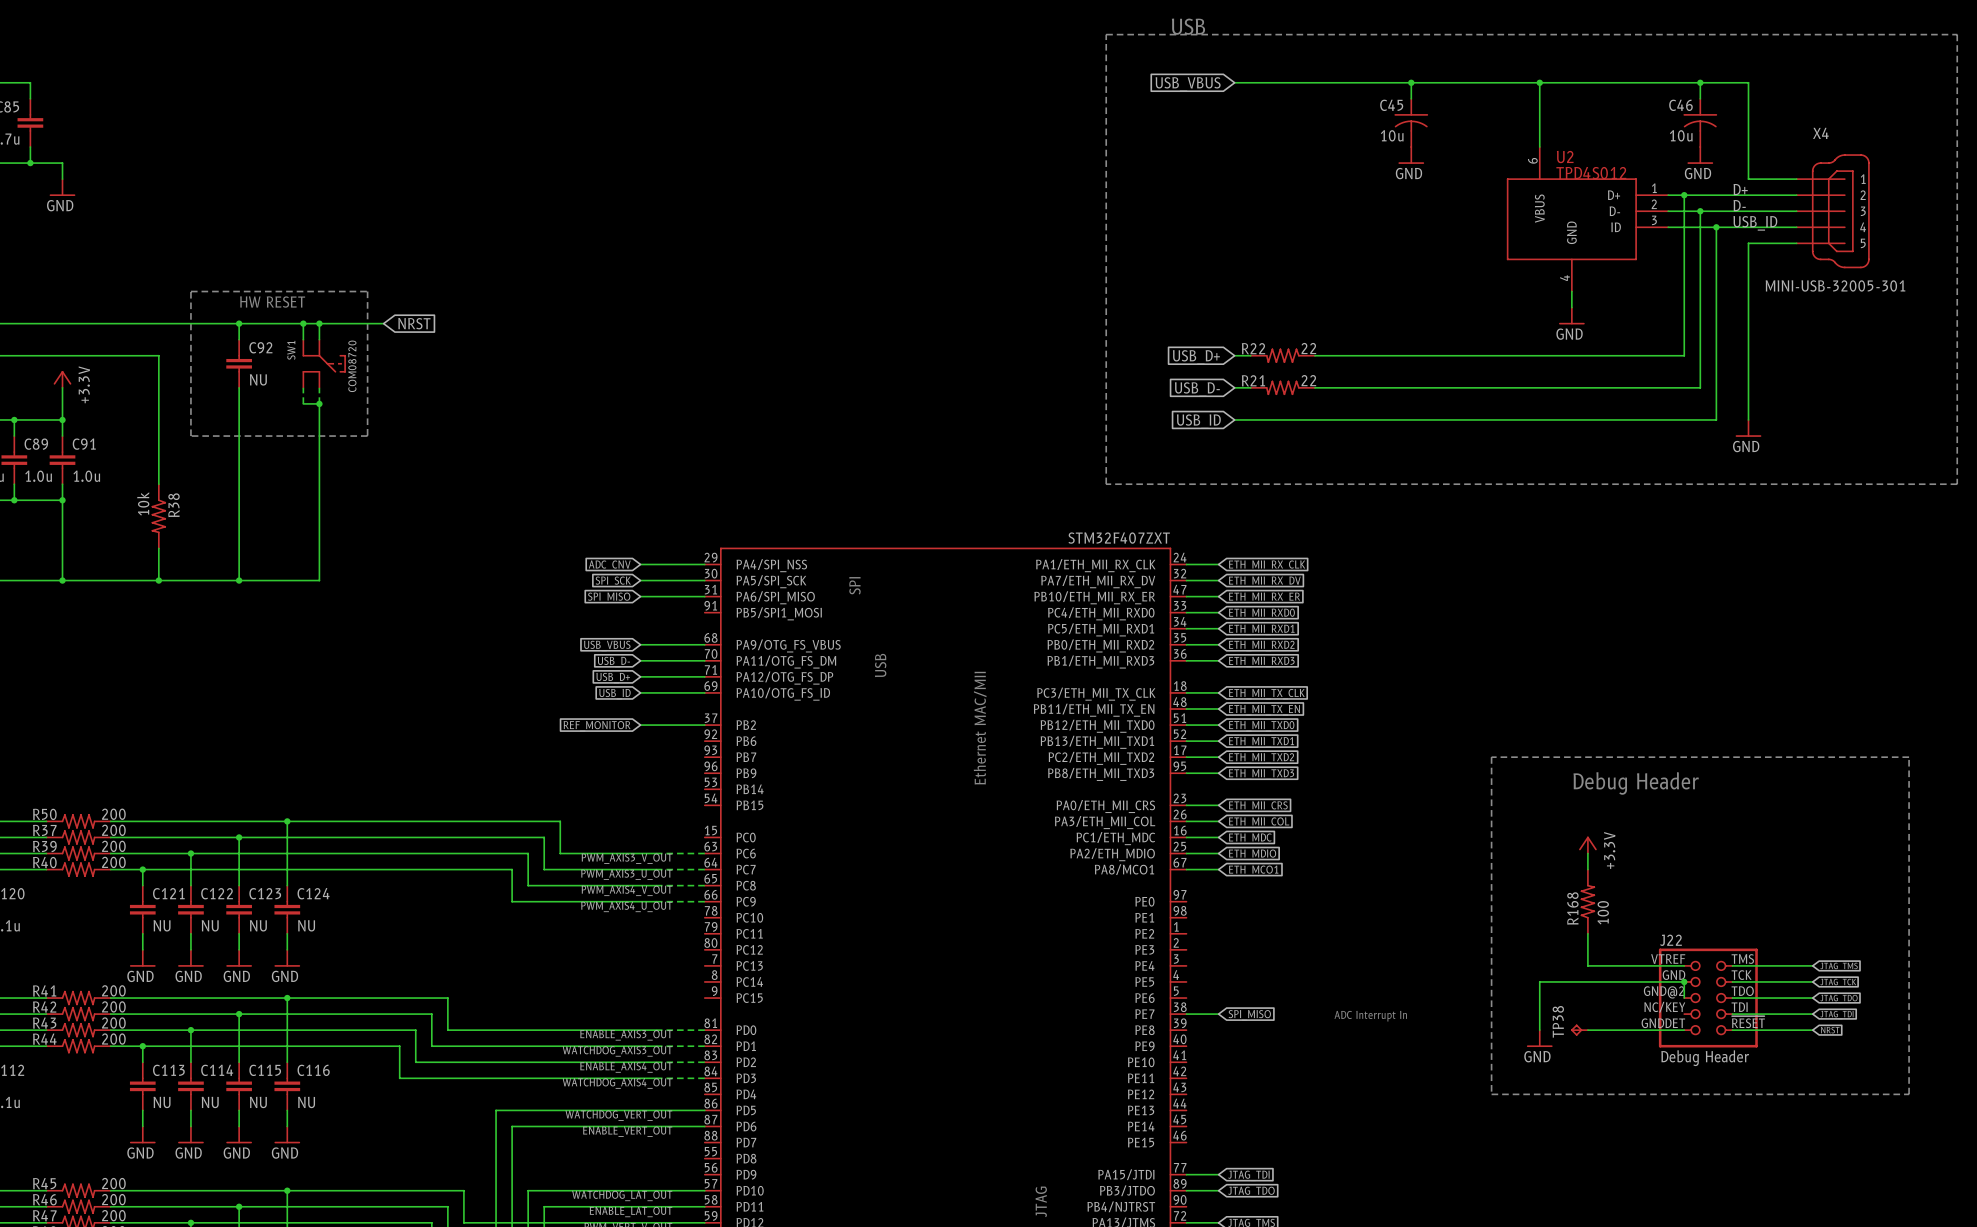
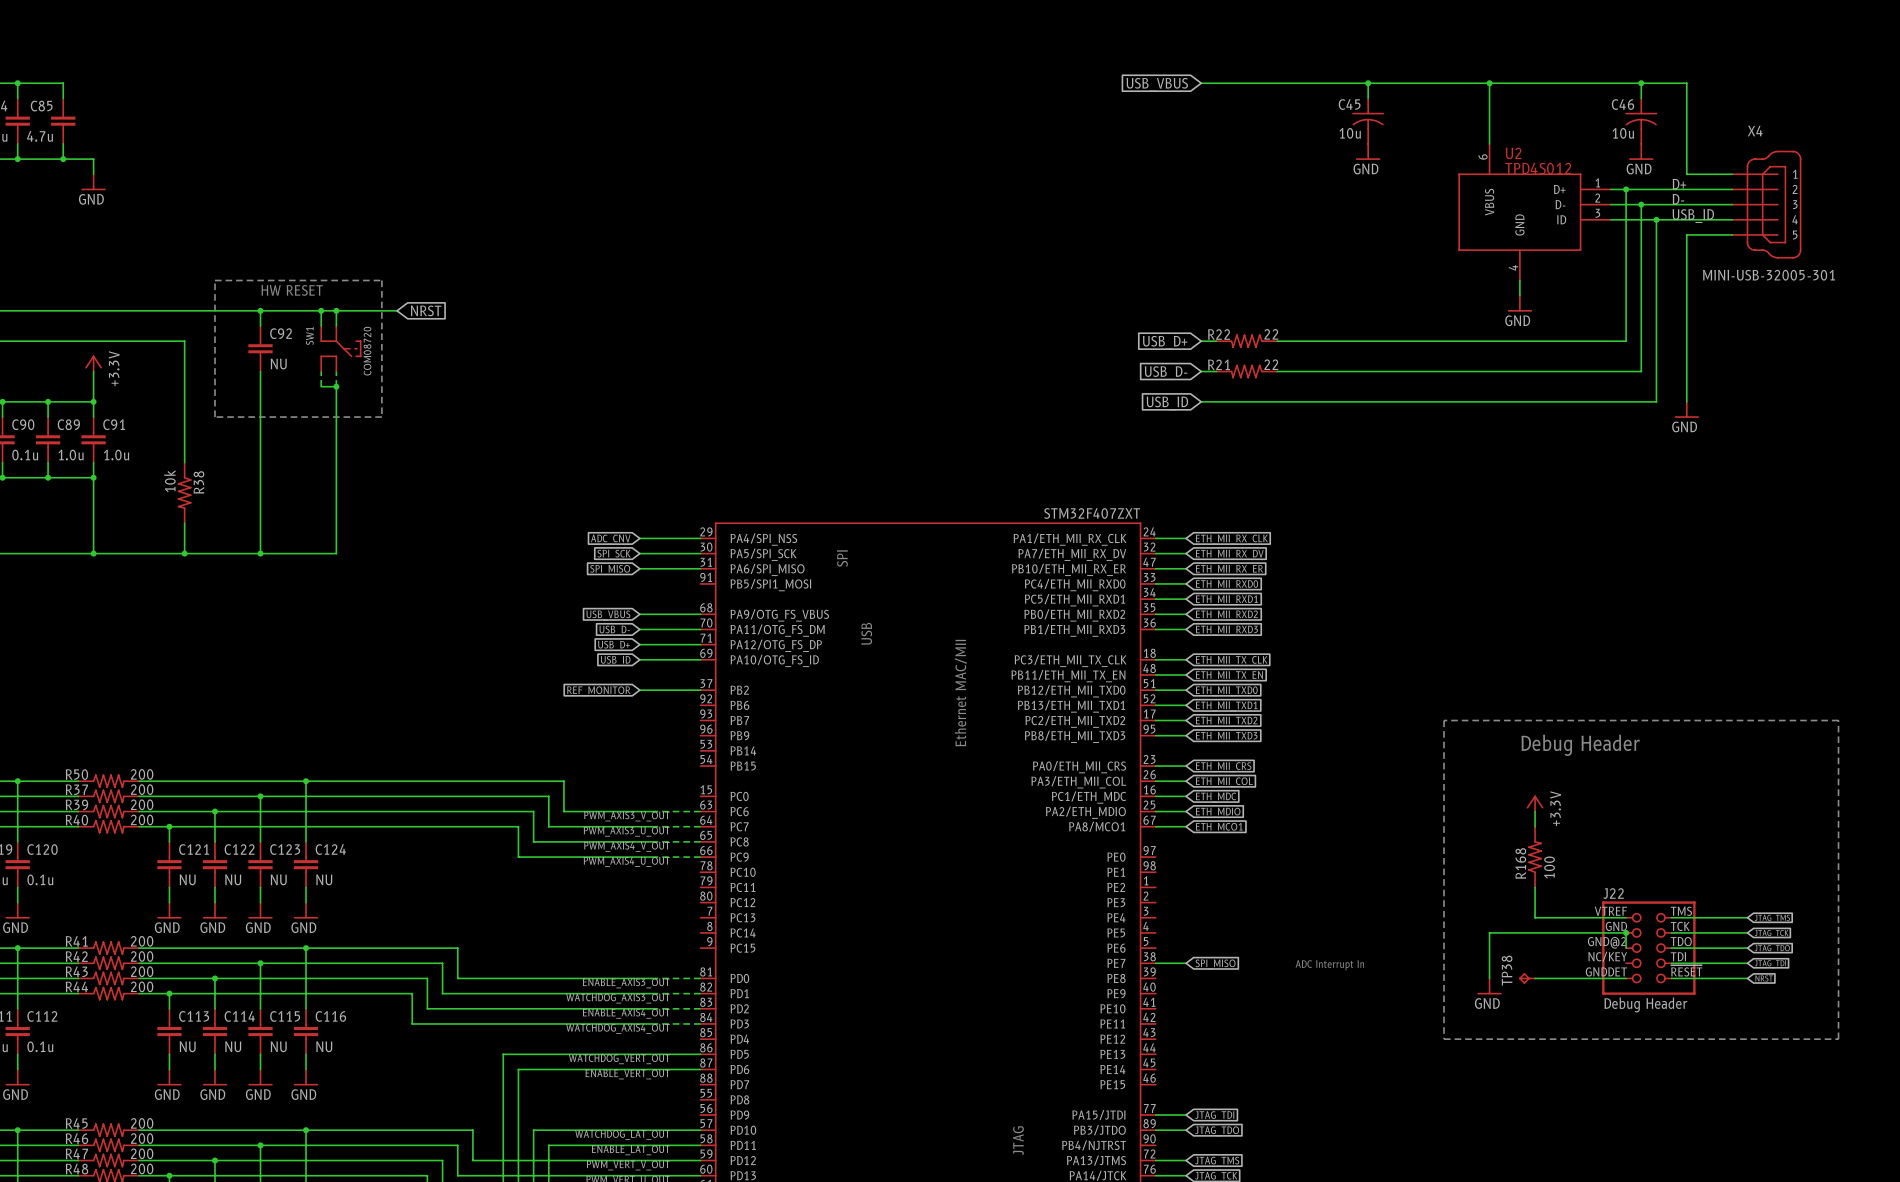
text: USB (1188, 26) -> none
line: (1106, 34) (1957, 34) (1957, 484) (1106, 484) (1106, 34) -> none

